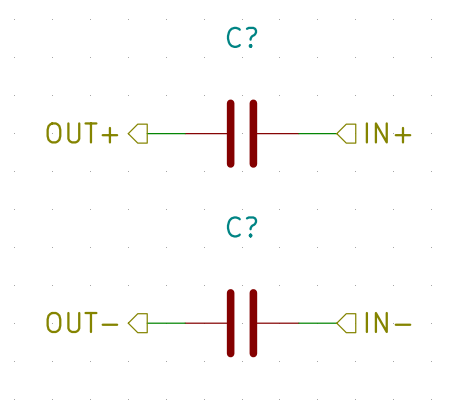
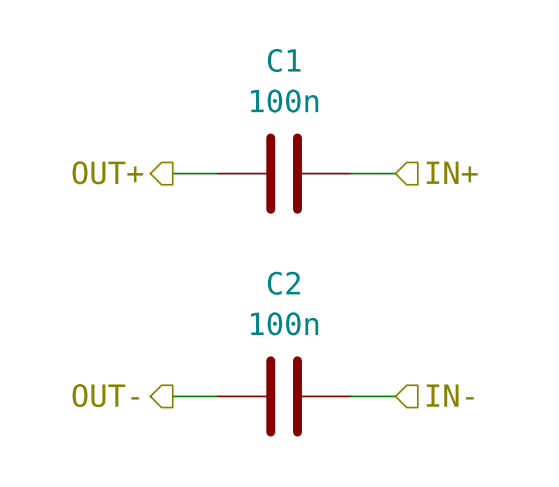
C? name: C? (242, 37) -> C1 (284, 60)
C? value: none -> 100n (284, 101)
C? name: C? (242, 226) -> C2 (283, 283)
C? value: none -> 100n (284, 323)

